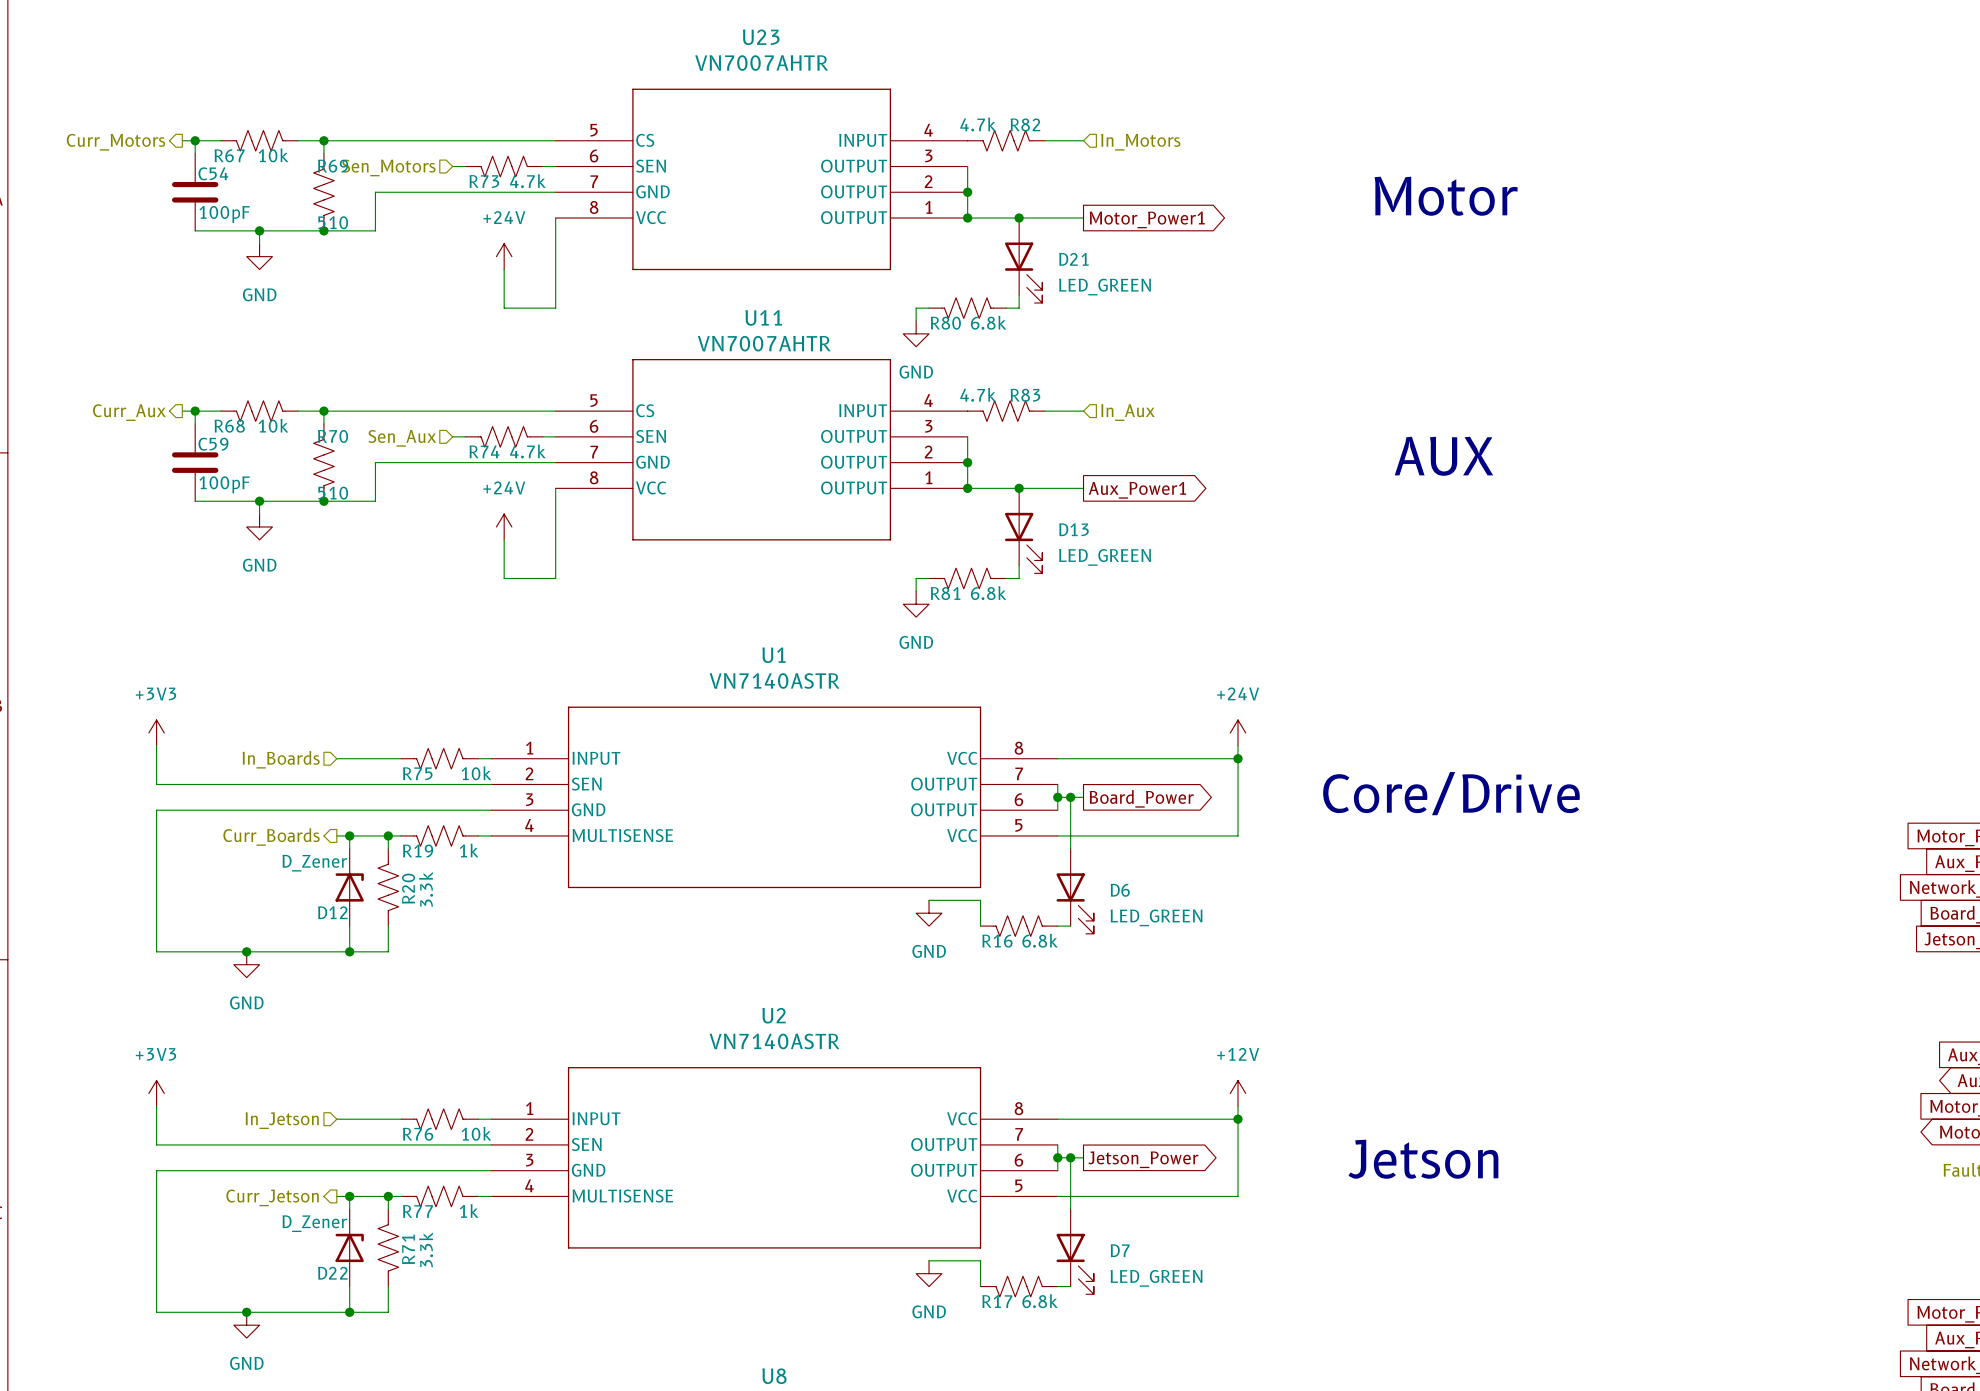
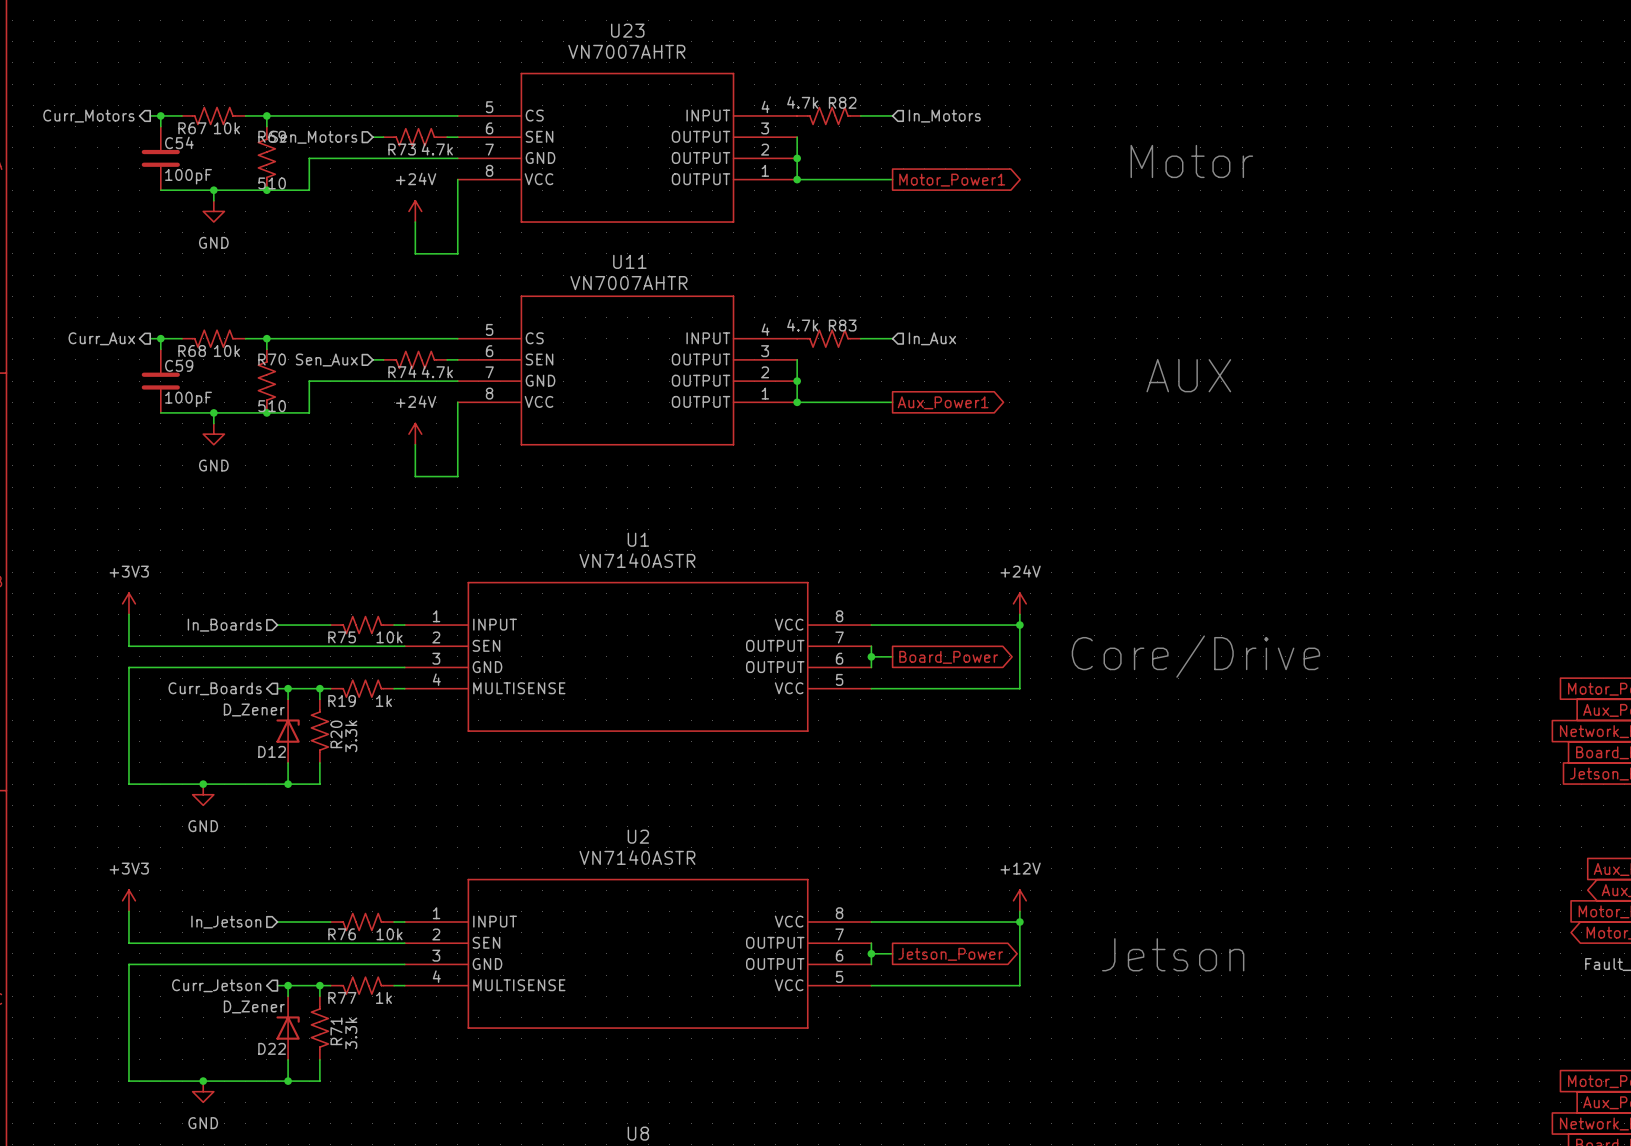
junction: (1019, 218) -> none
D21: LED_GREEN (1023, 260) -> none
wire: (1019, 295) (1019, 308) (1006, 308) -> none
wire: (929, 308) (916, 308) (916, 321) -> none
R80: 6.8k (967, 308) -> none
power symbol: GND (916, 333) -> none
junction: (1019, 488) -> none
D13: LED_GREEN (1023, 530) -> none
wire: (1019, 565) (1019, 578) (1006, 578) -> none
wire: (929, 578) (916, 578) (916, 591) -> none
R81: 6.8k (967, 578) -> none
power symbol: GND (916, 604) -> none
wire: (1070, 797) (1070, 848) -> none
junction: (1070, 797) -> none
D6: LED_GREEN (1075, 891) -> none
wire: (929, 900) (980, 900) (980, 926) -> none
power symbol: GND (929, 913) -> none
R16: 6.8k (1019, 926) -> none
wire: (1057, 926) (1070, 926) -> none
wire: (1070, 1157) (1070, 1209) -> none
junction: (1070, 1157) -> none
D7: LED_GREEN (1075, 1251) -> none
wire: (929, 1260) (980, 1260) (980, 1286) -> none
power symbol: GND (929, 1273) -> none
R17: 6.8k (1019, 1286) -> none
wire: (1057, 1286) (1070, 1286) -> none

